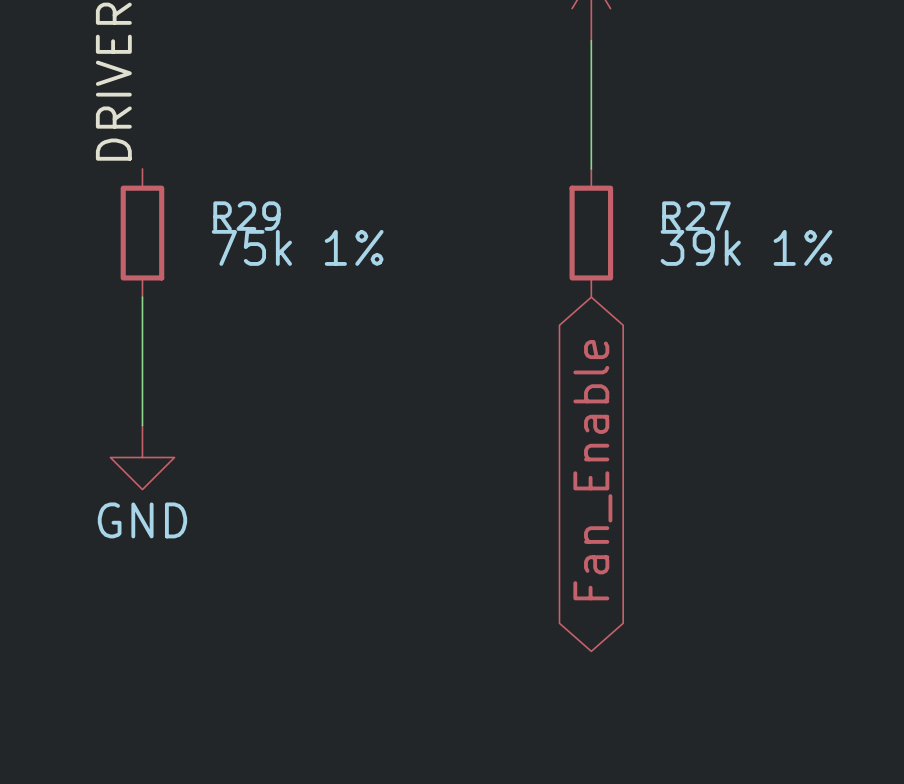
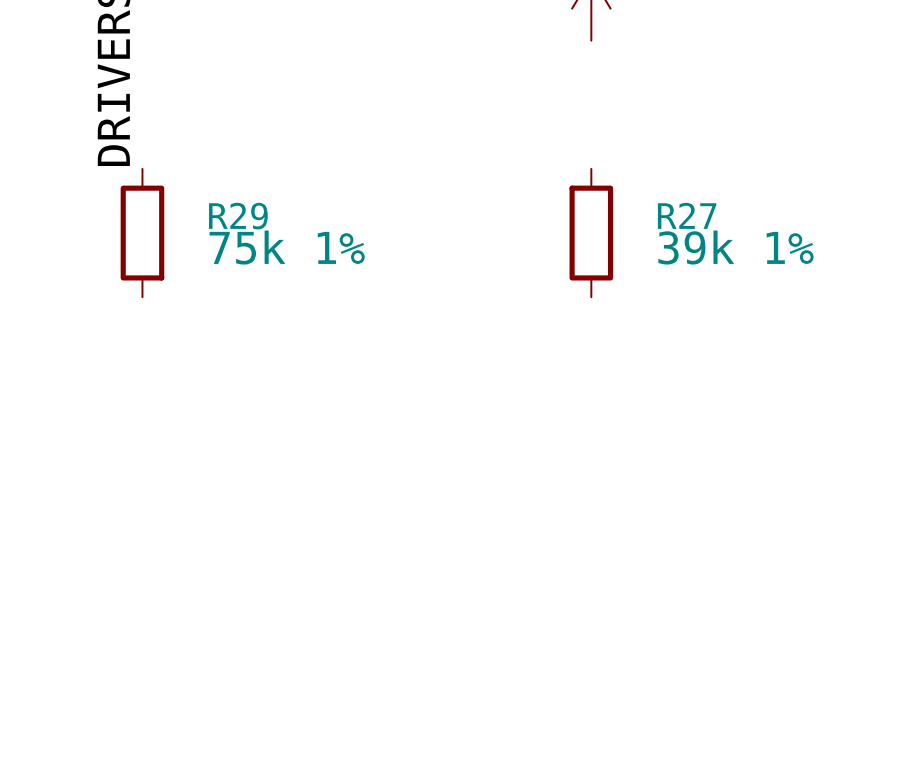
wire: (591, 40) (591, 168) -> none
wire: (142, 297) (142, 425) -> none
power symbol: GND (142, 457) -> none
global label: Fan_Enable (592, 470) -> none

